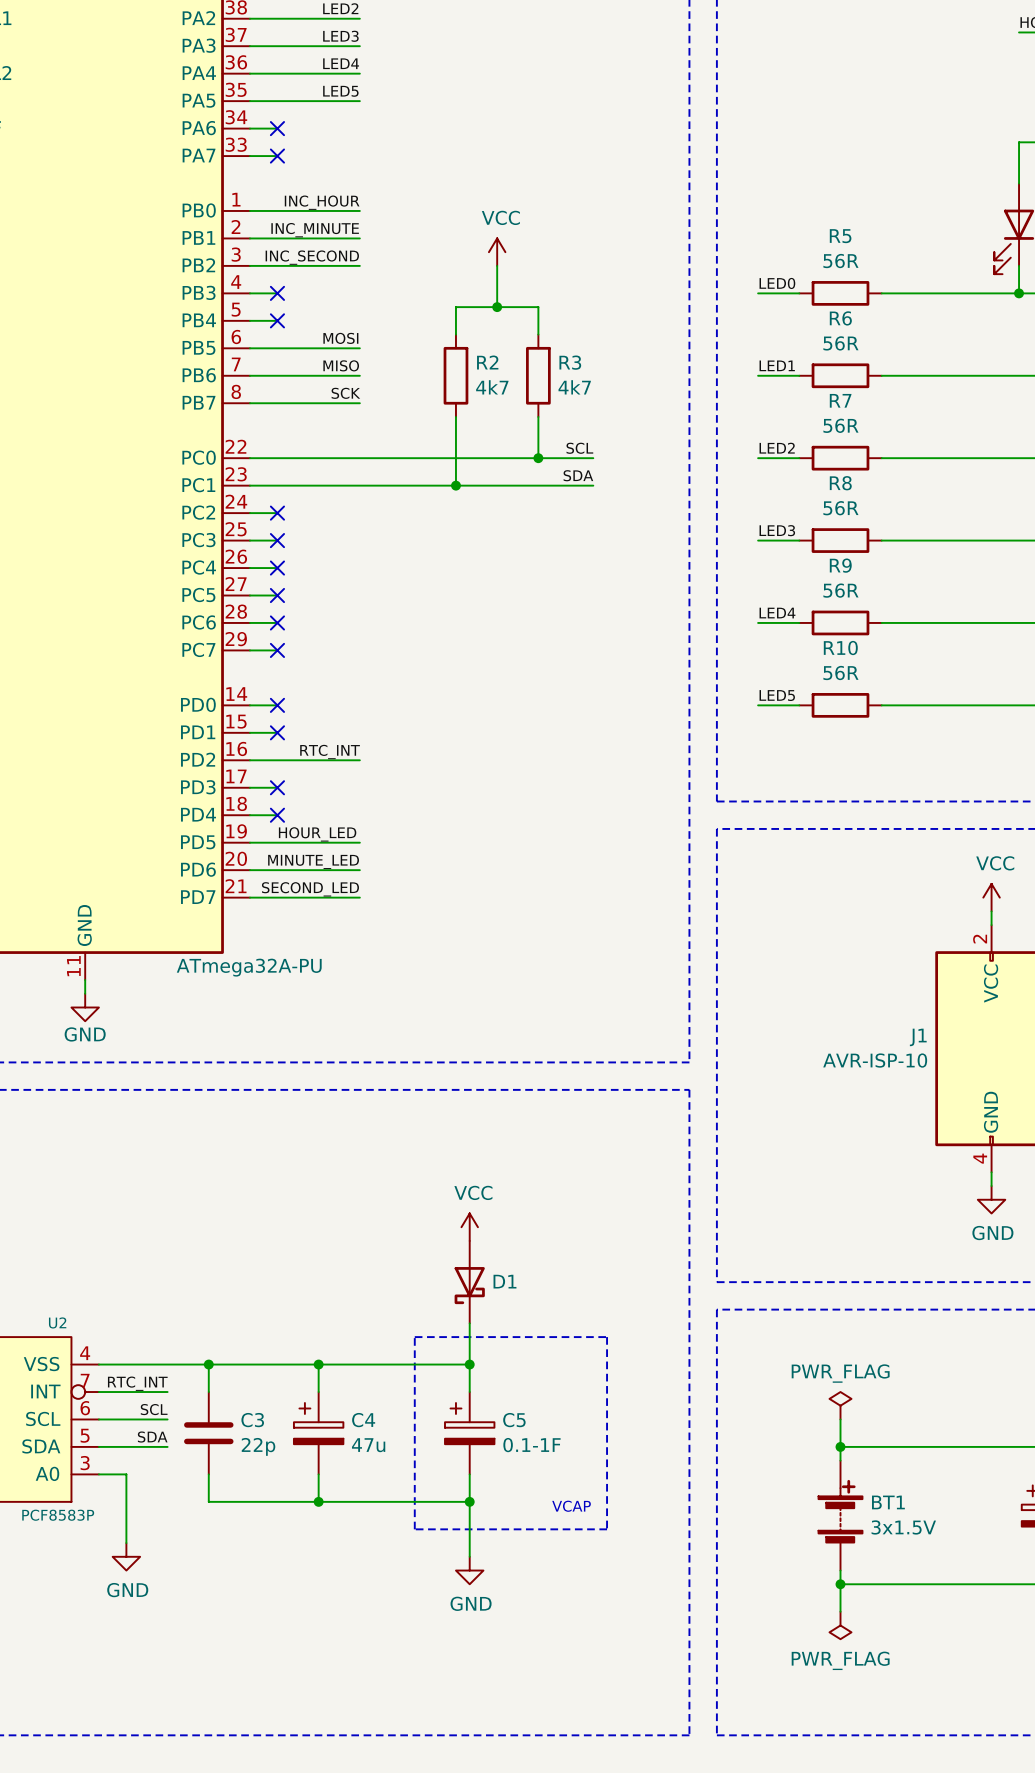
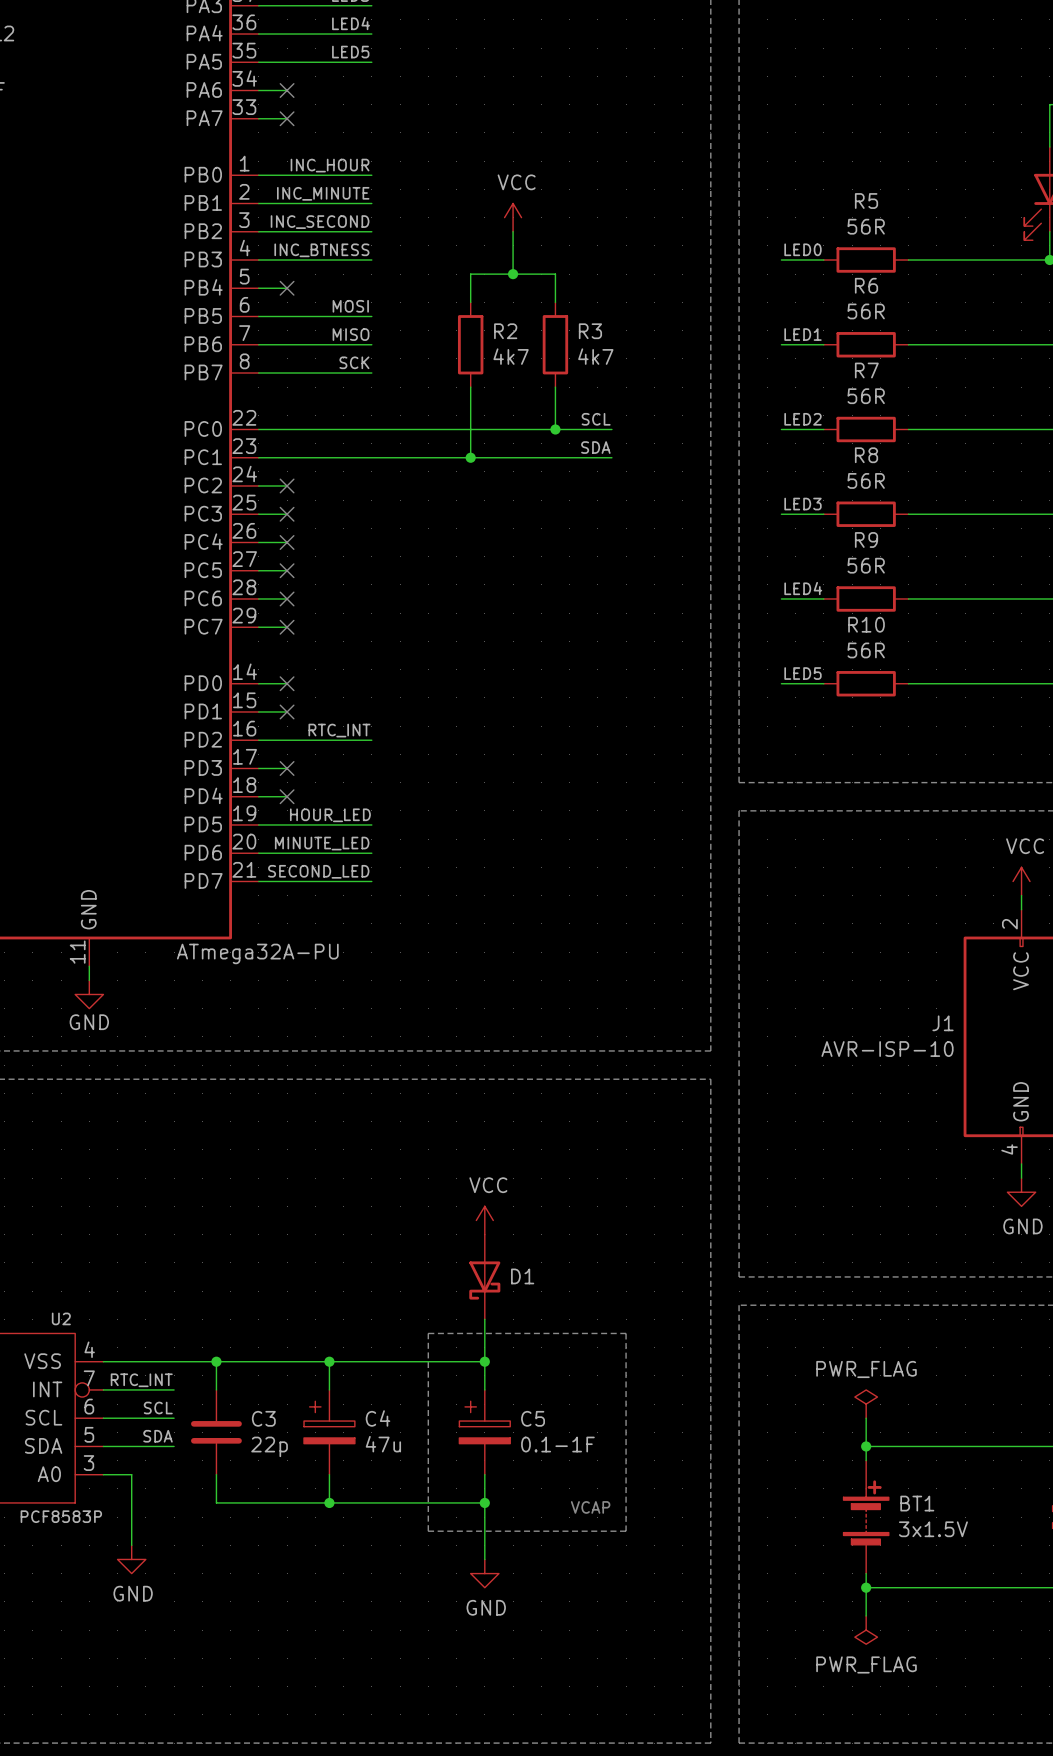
label: none -> INC_BTNESS (321, 250)
wire: none -> (287, 260) (371, 260)
no-connect mark: (277, 293) -> none

